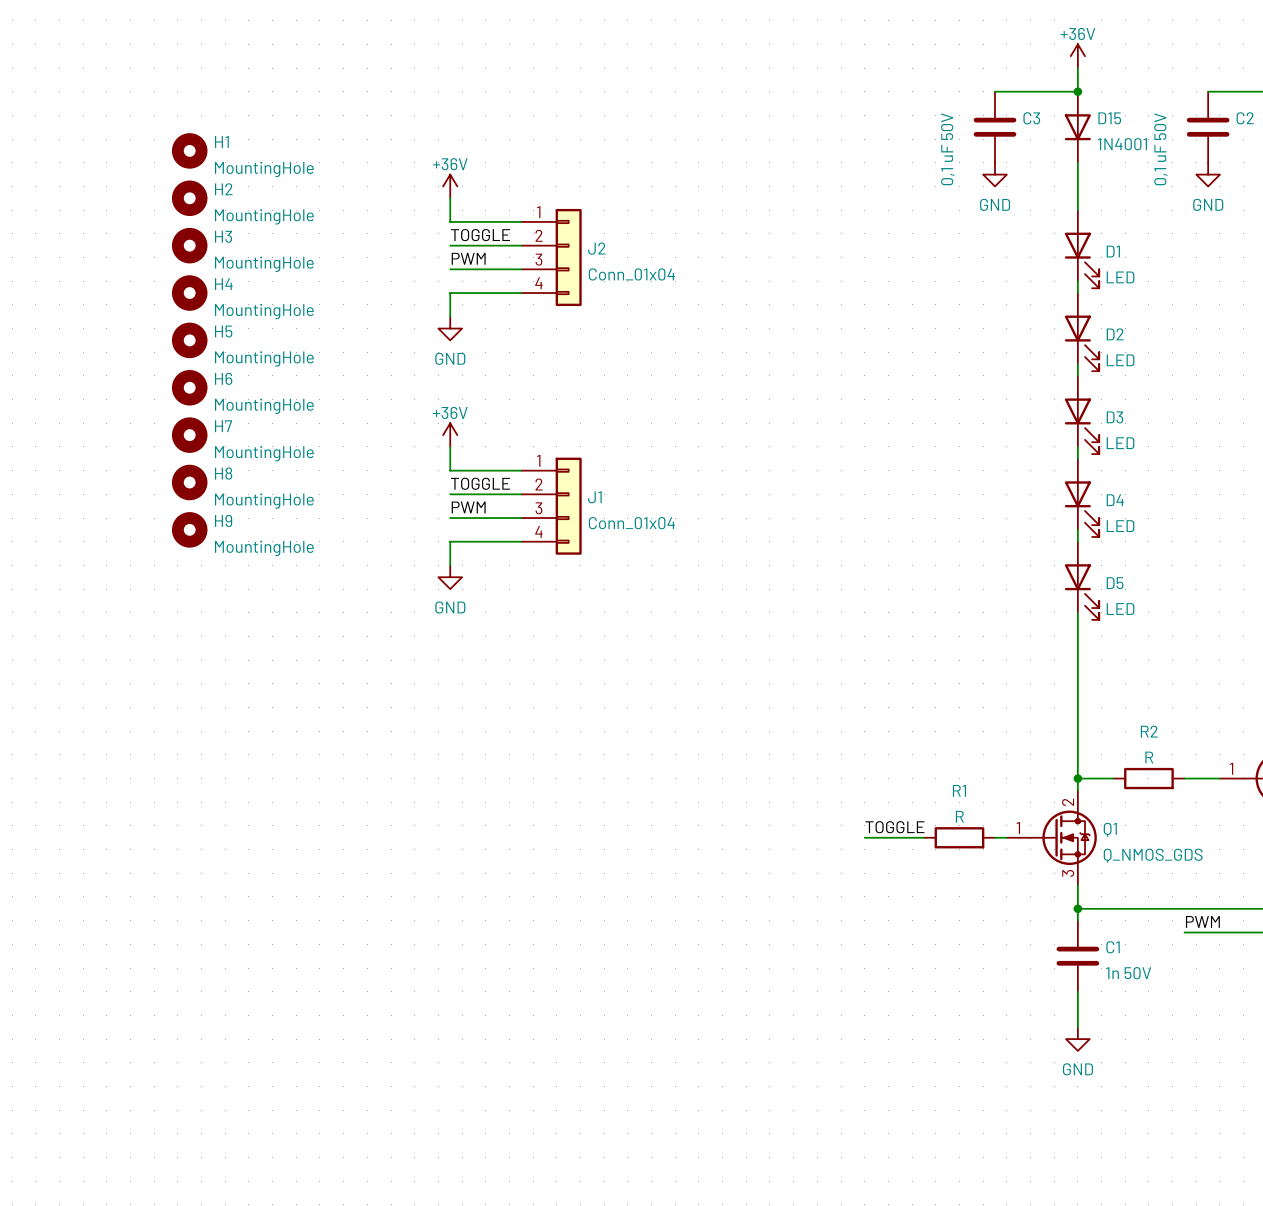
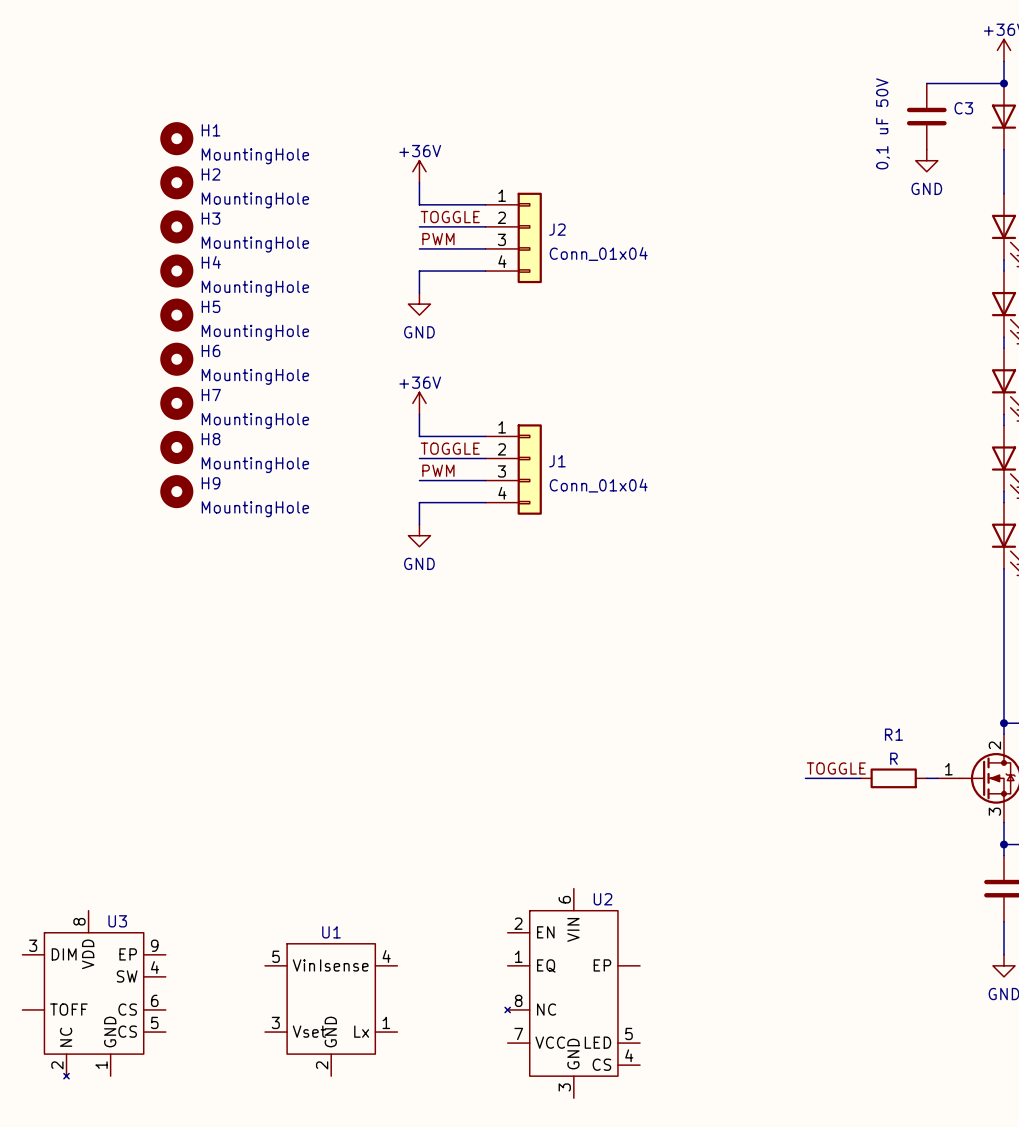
U2: none -> (572, 993)
U3: none -> (94, 994)
U1: none -> (331, 1009)

